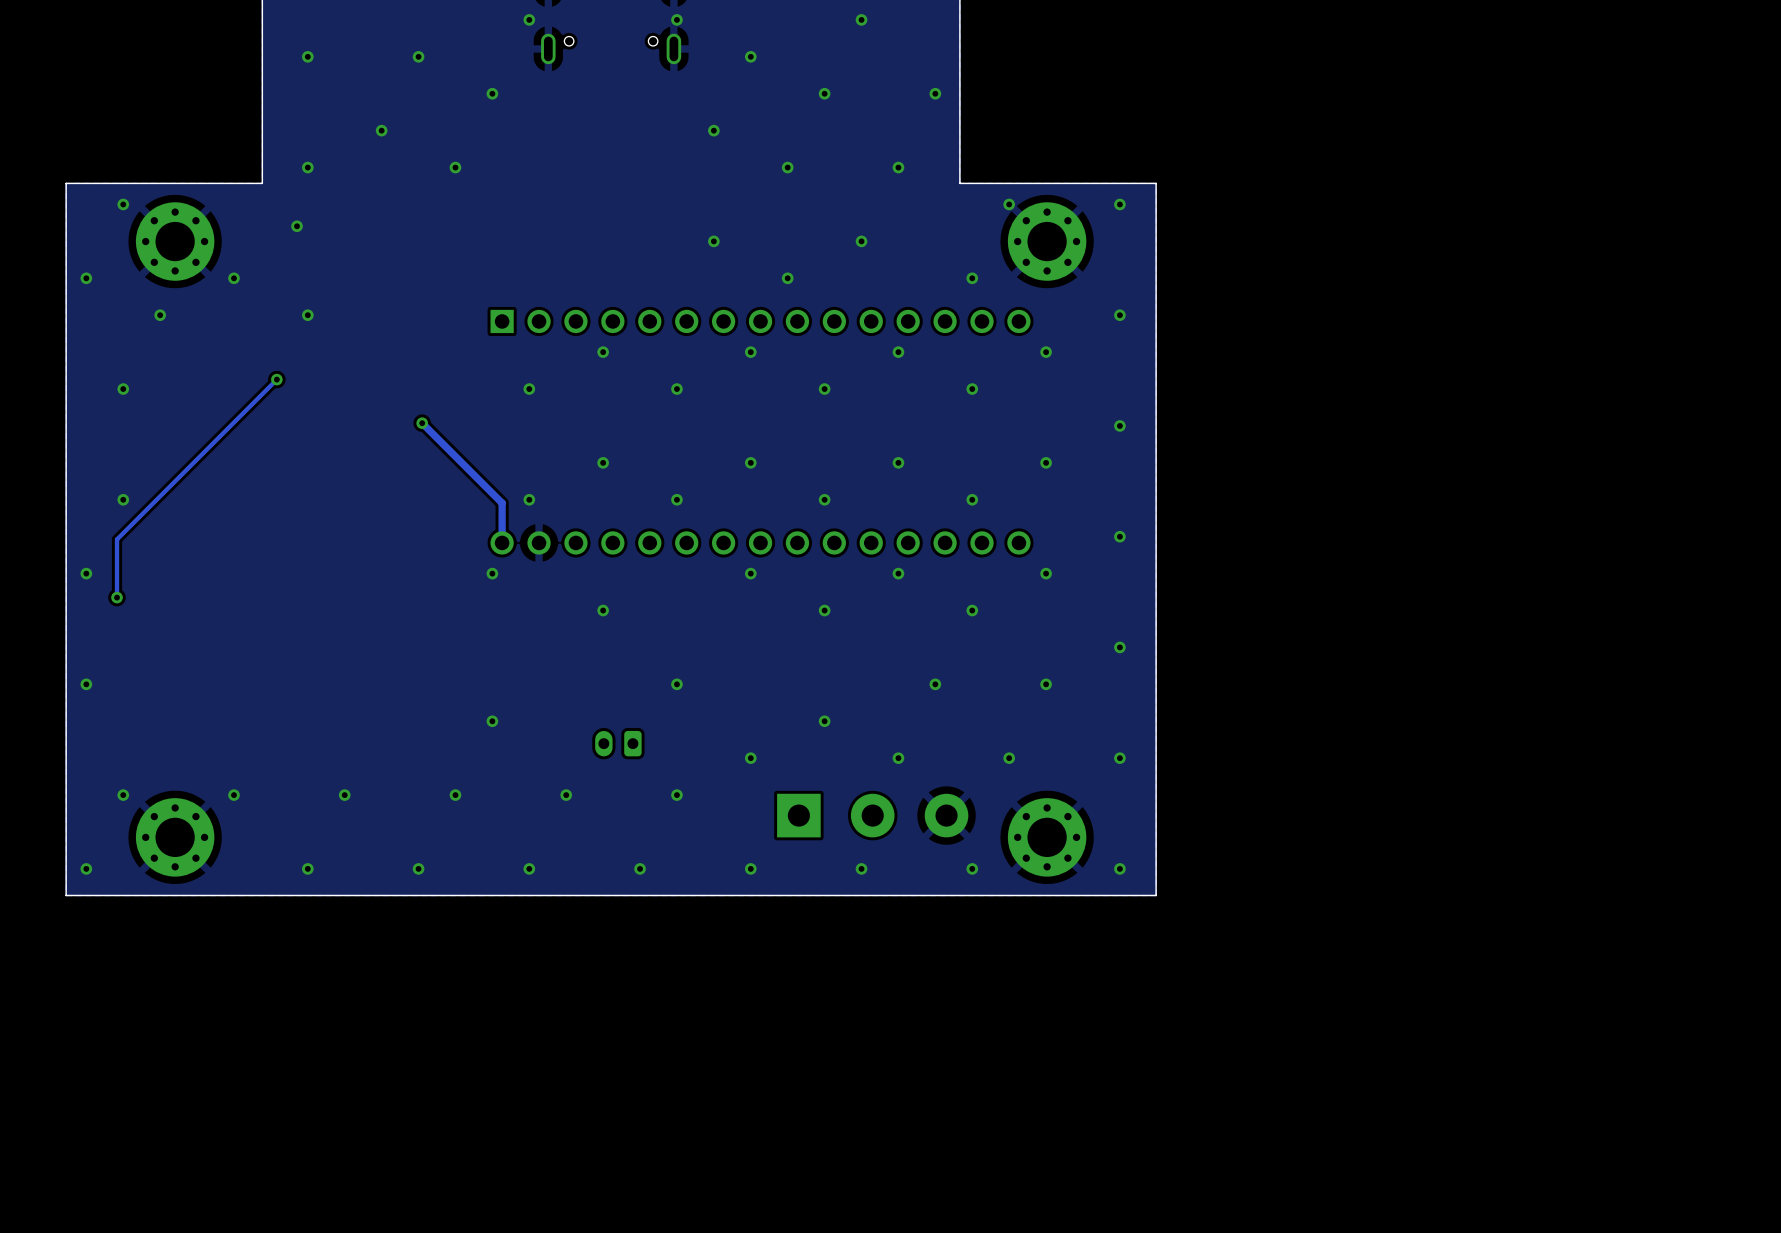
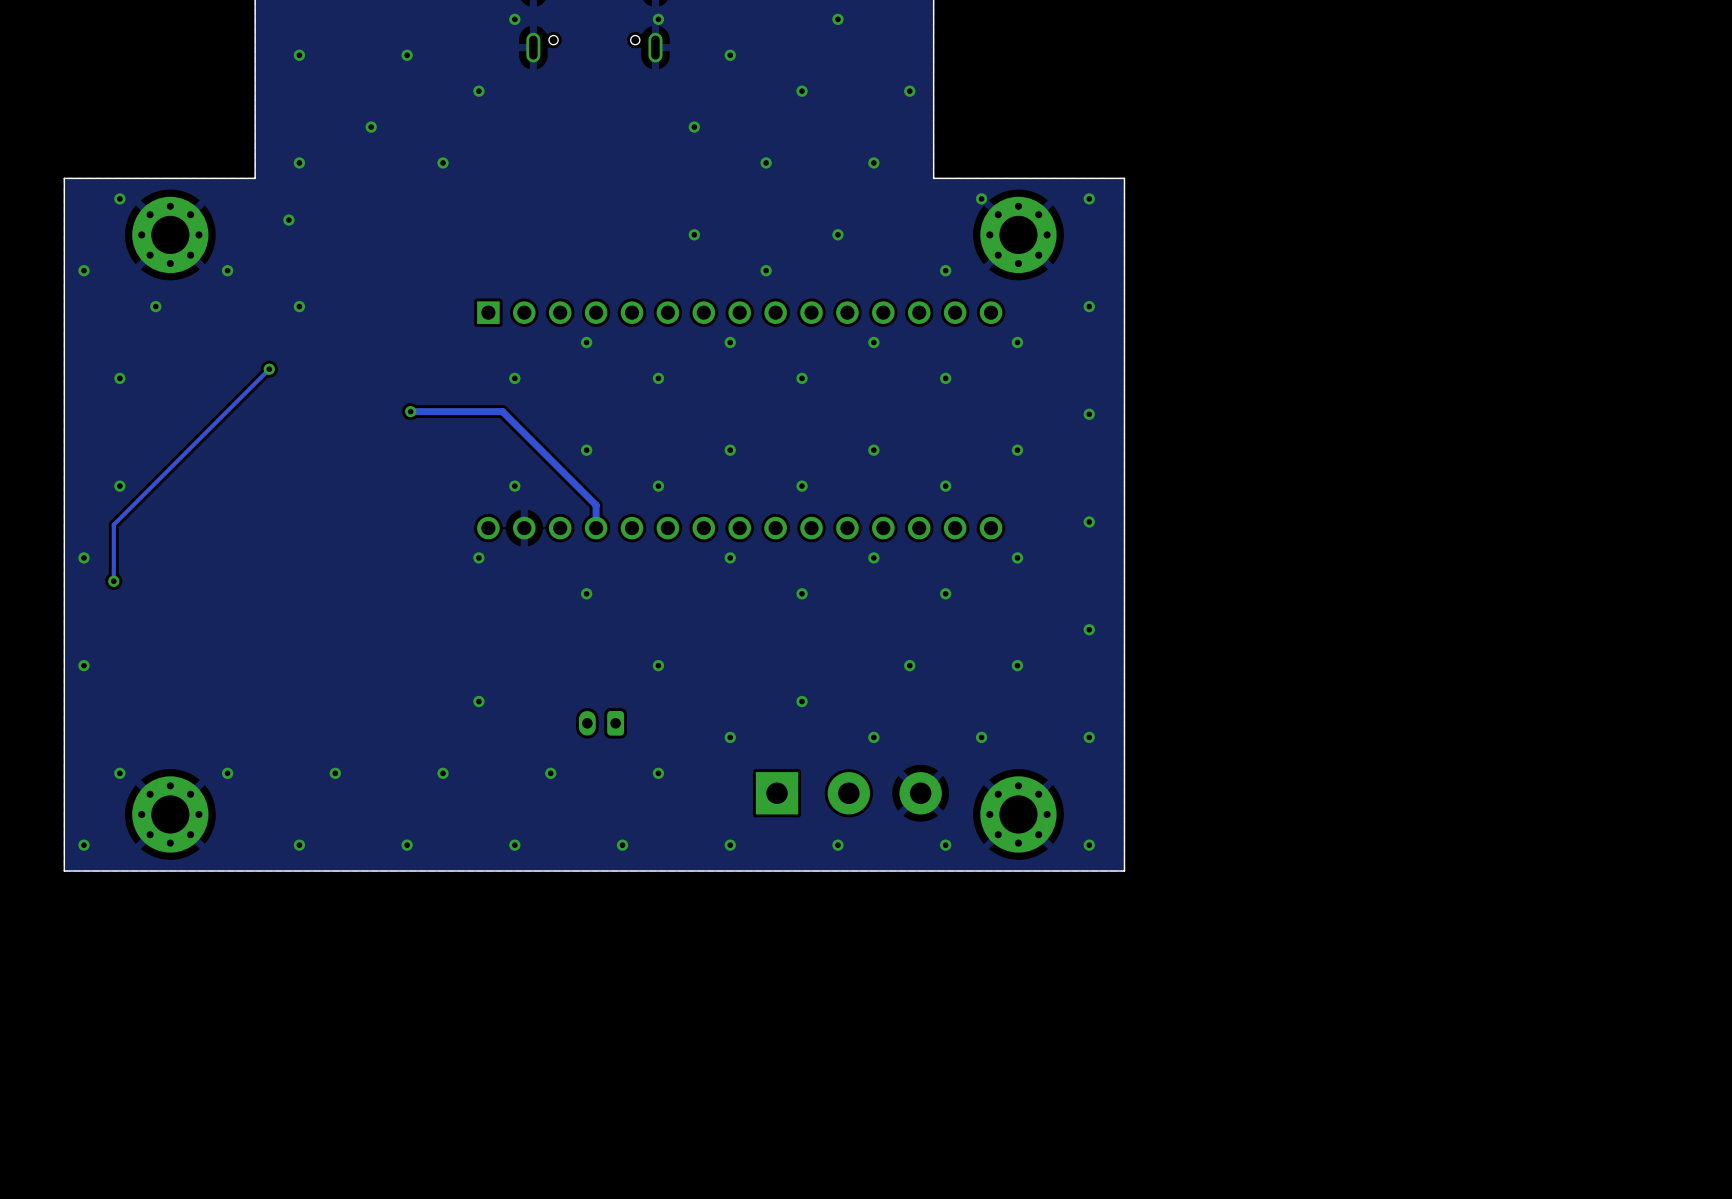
track: (422, 423) (502, 503) (502, 542) -> (410, 411) (502, 411) (596, 505) (596, 528)

